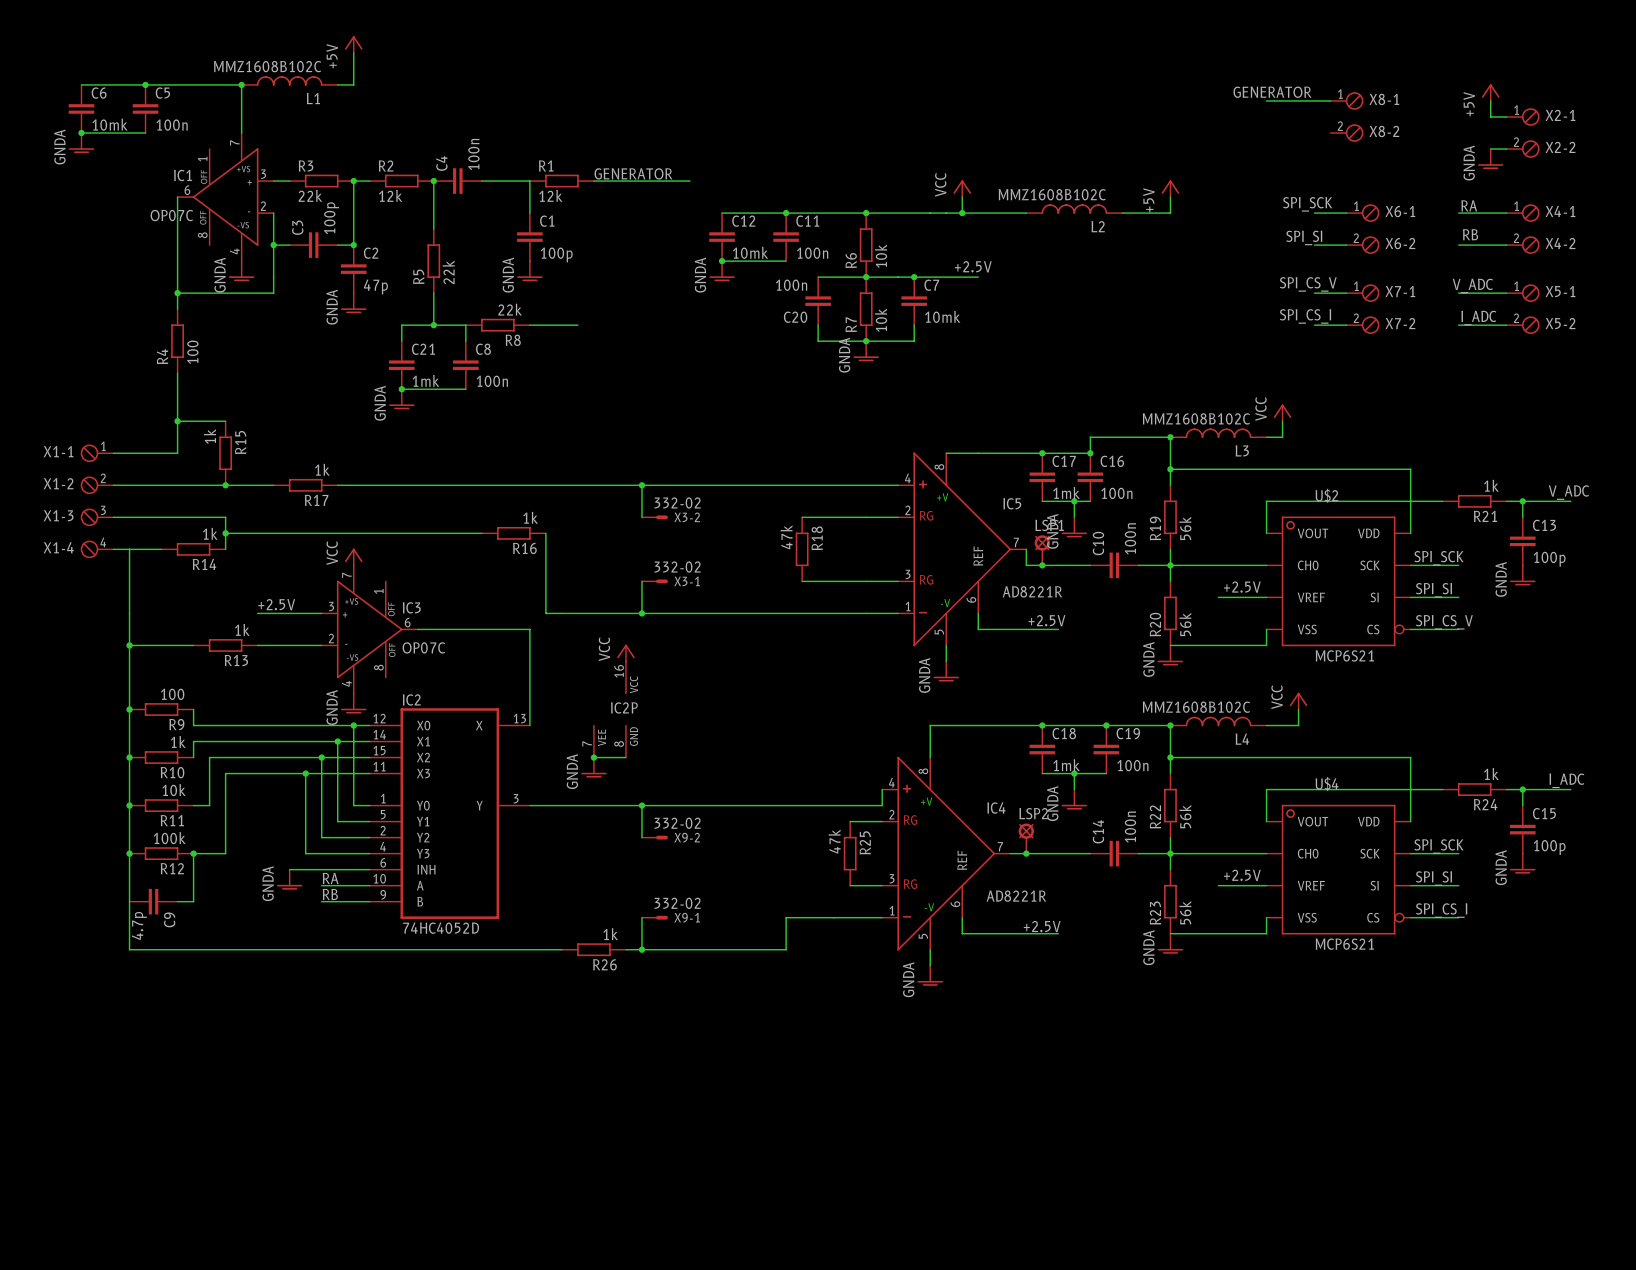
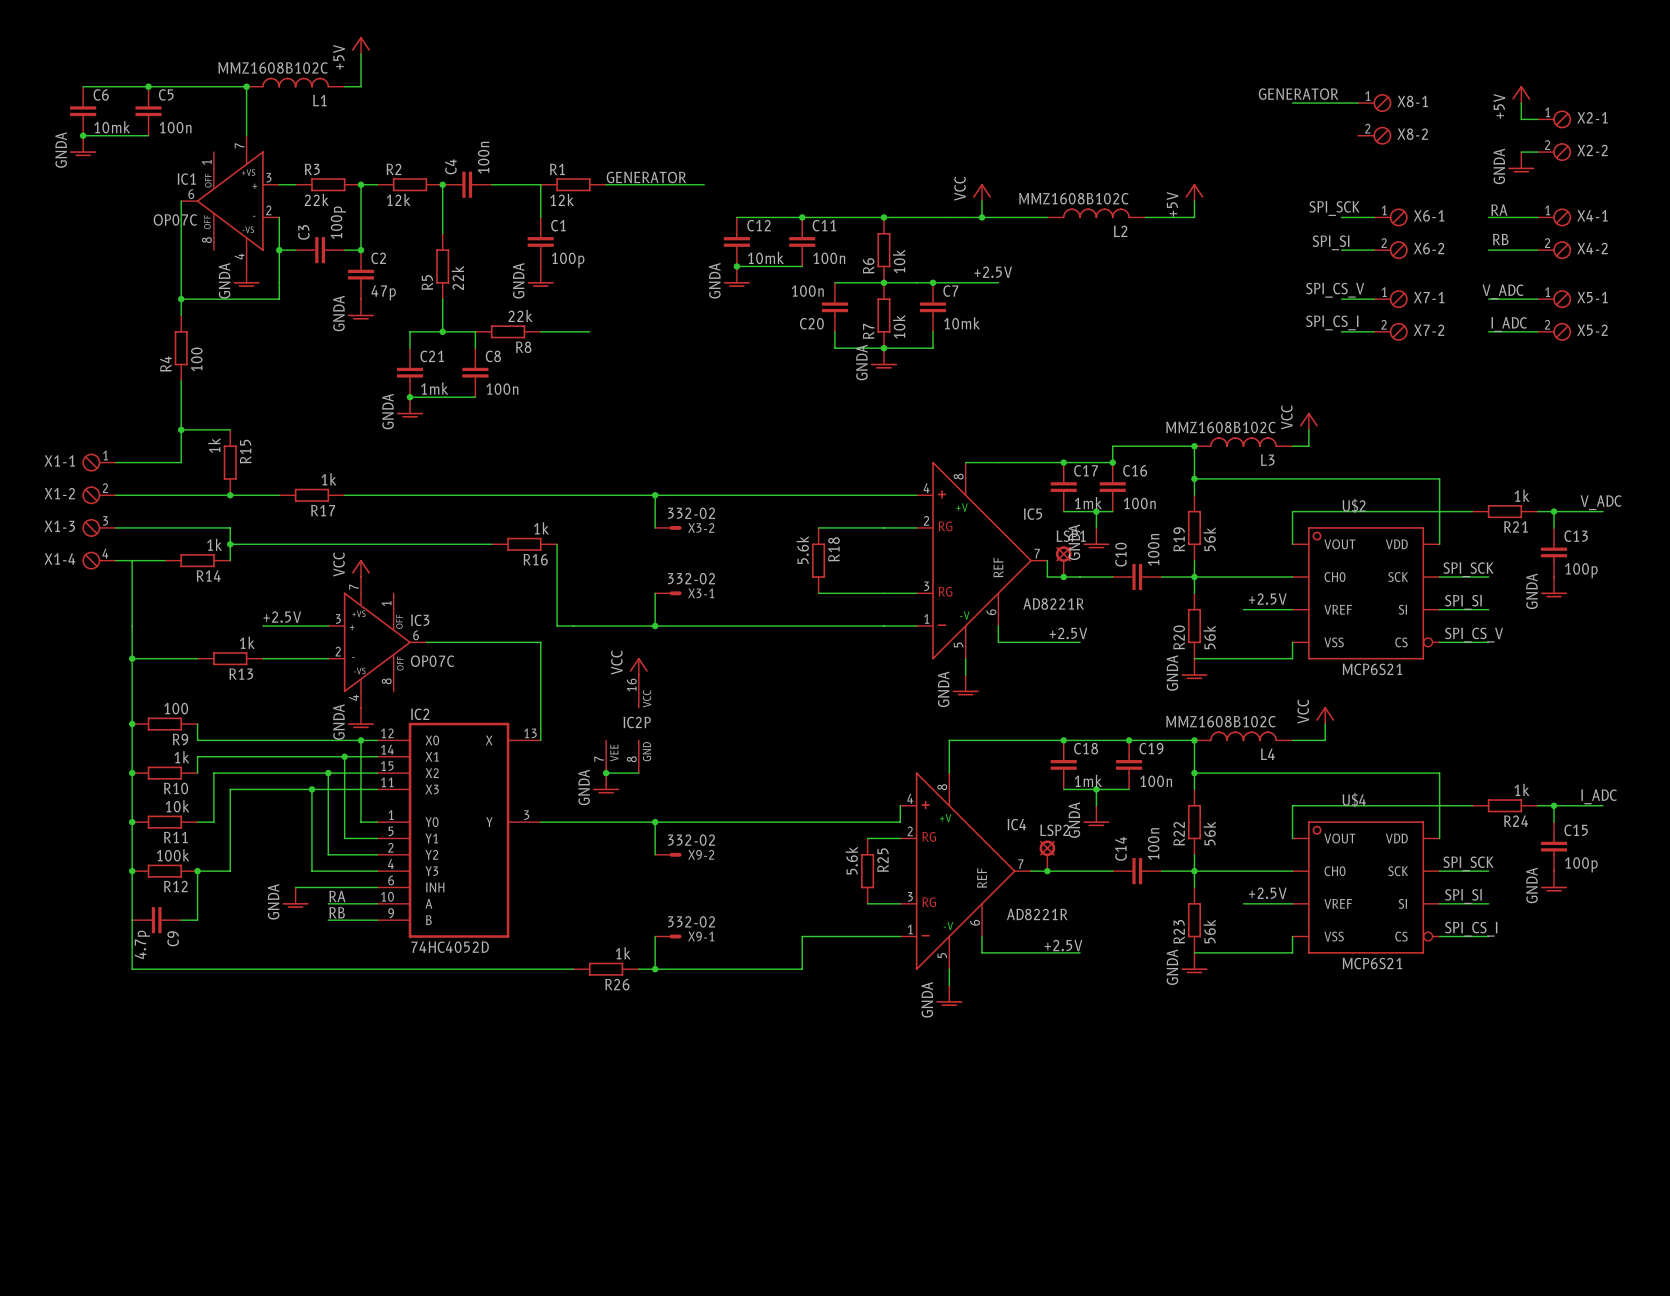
R18 value: 47k (786, 537) -> 5.6k (802, 550)
R25 value: 47k (834, 841) -> 5.6k (851, 860)

